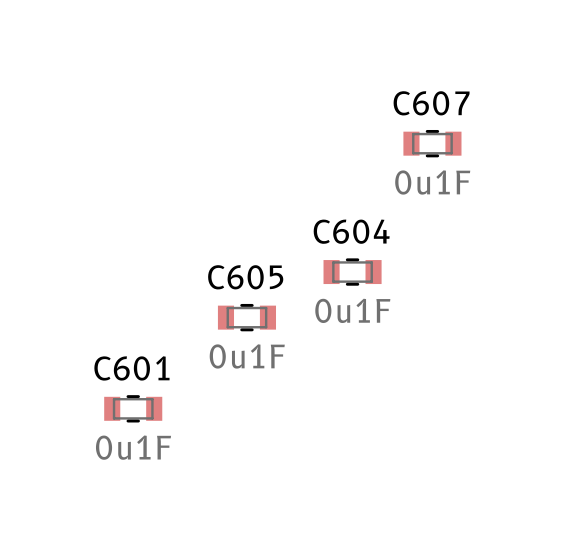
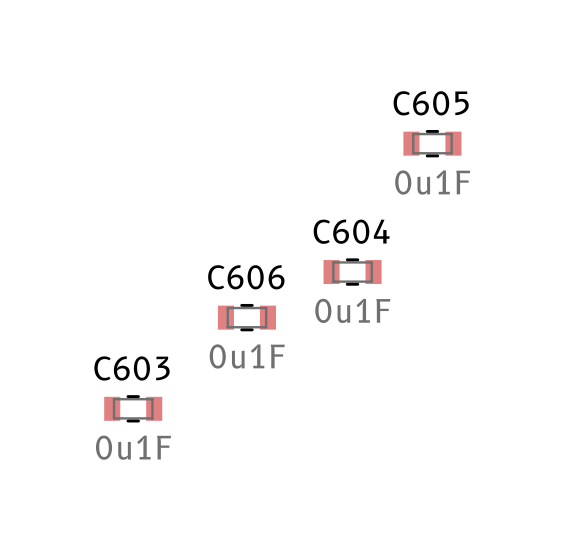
C607 name: C607 (431, 103) -> C605 (431, 103)
C605 name: C605 (245, 277) -> C606 (246, 277)
C601 name: C601 (131, 368) -> C603 (132, 368)

